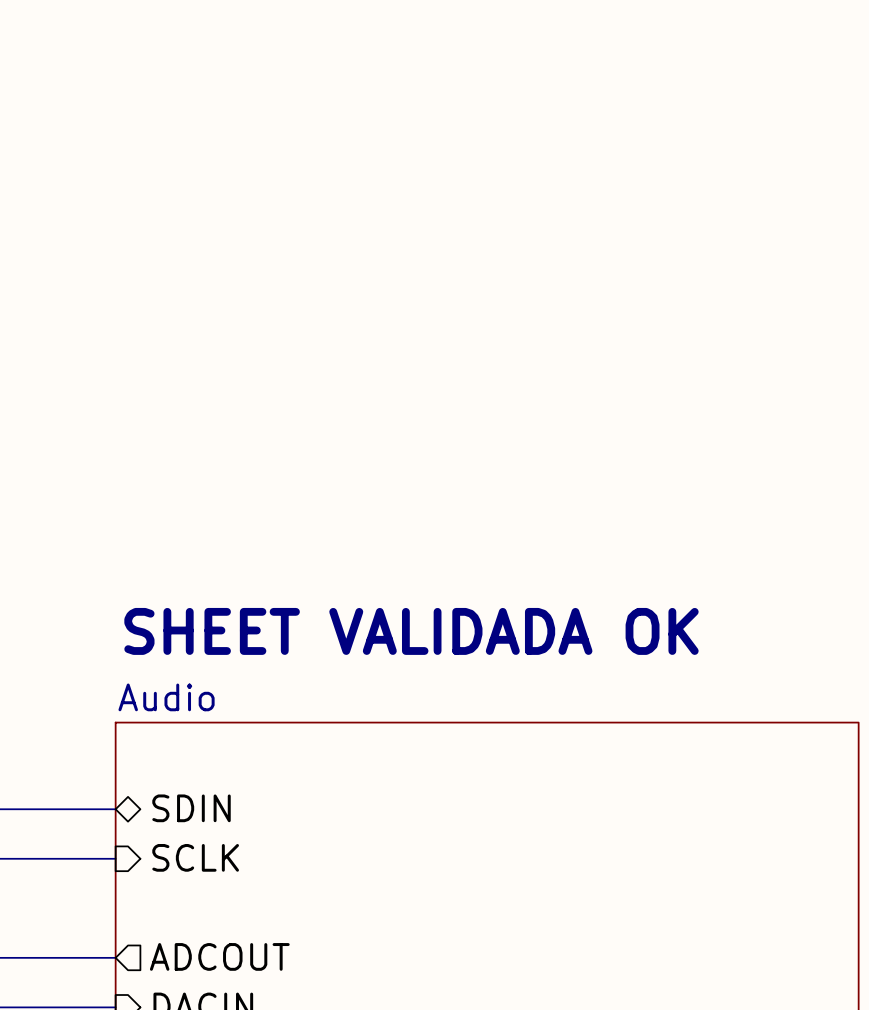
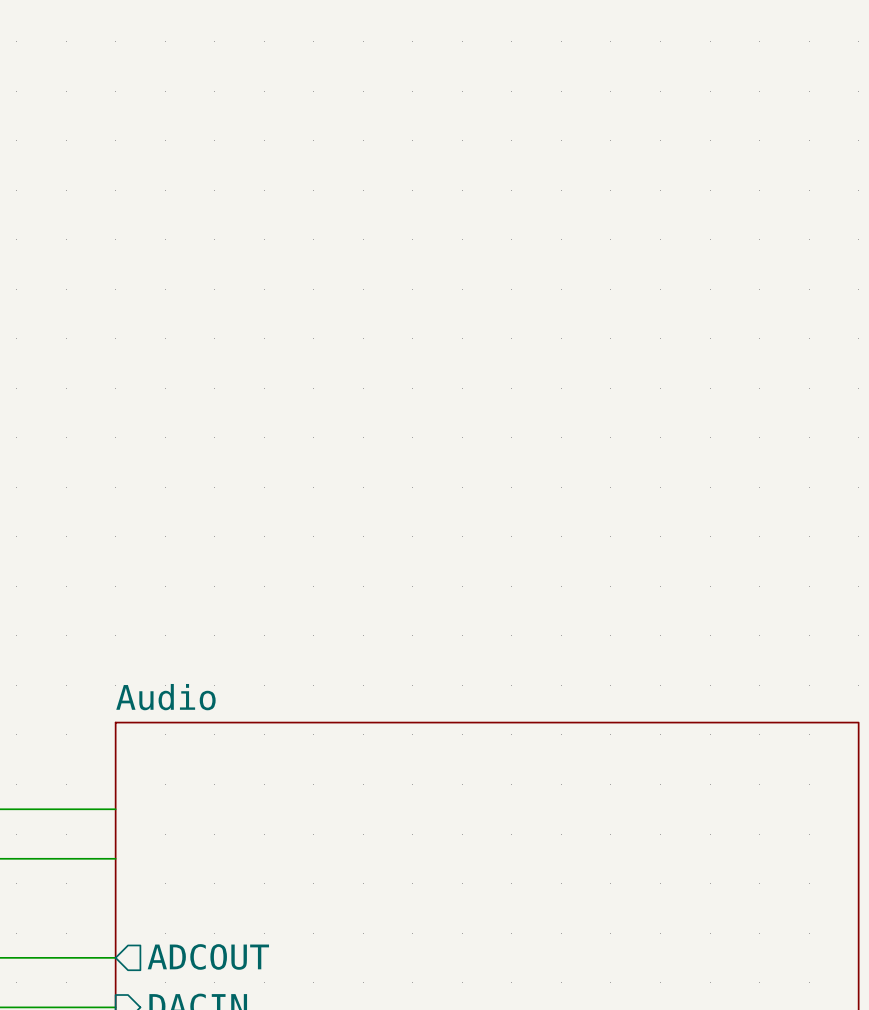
text: SHEET VALIDADA OK (411, 631) -> none
sheet pin: SDIN (191, 808) -> none
sheet pin: SCLK (195, 857) -> none

